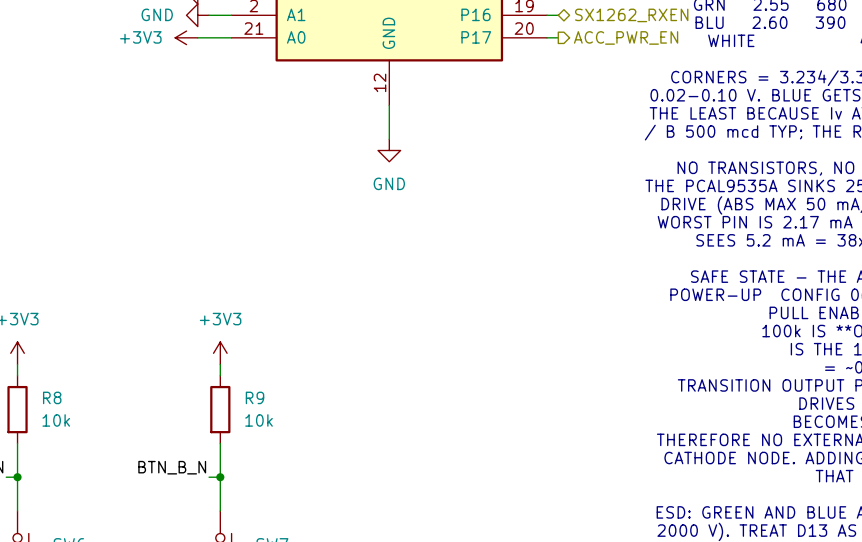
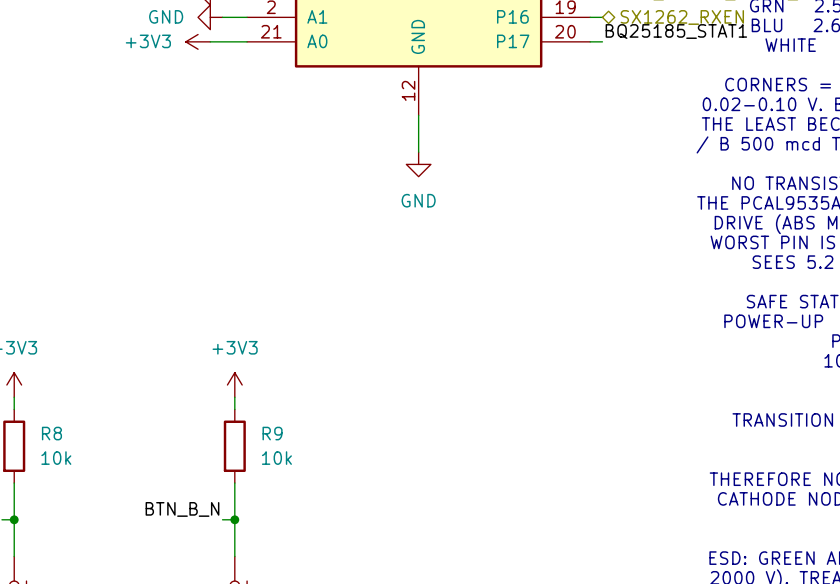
label: none -> BQ25185_STAT1 (676, 31)
hierarchical label: ACC_PWR_EN (626, 37) -> none

